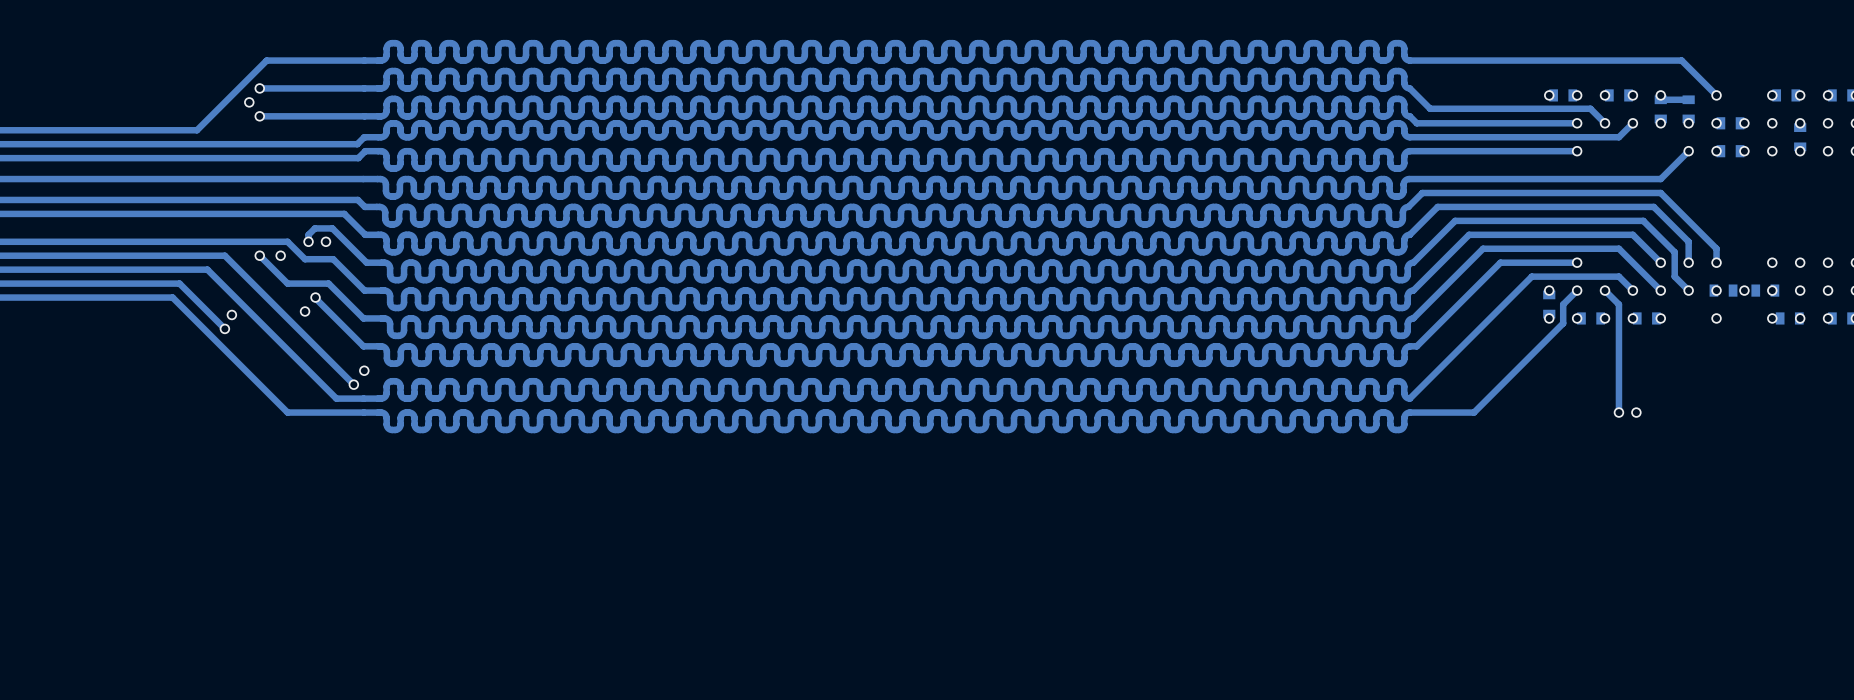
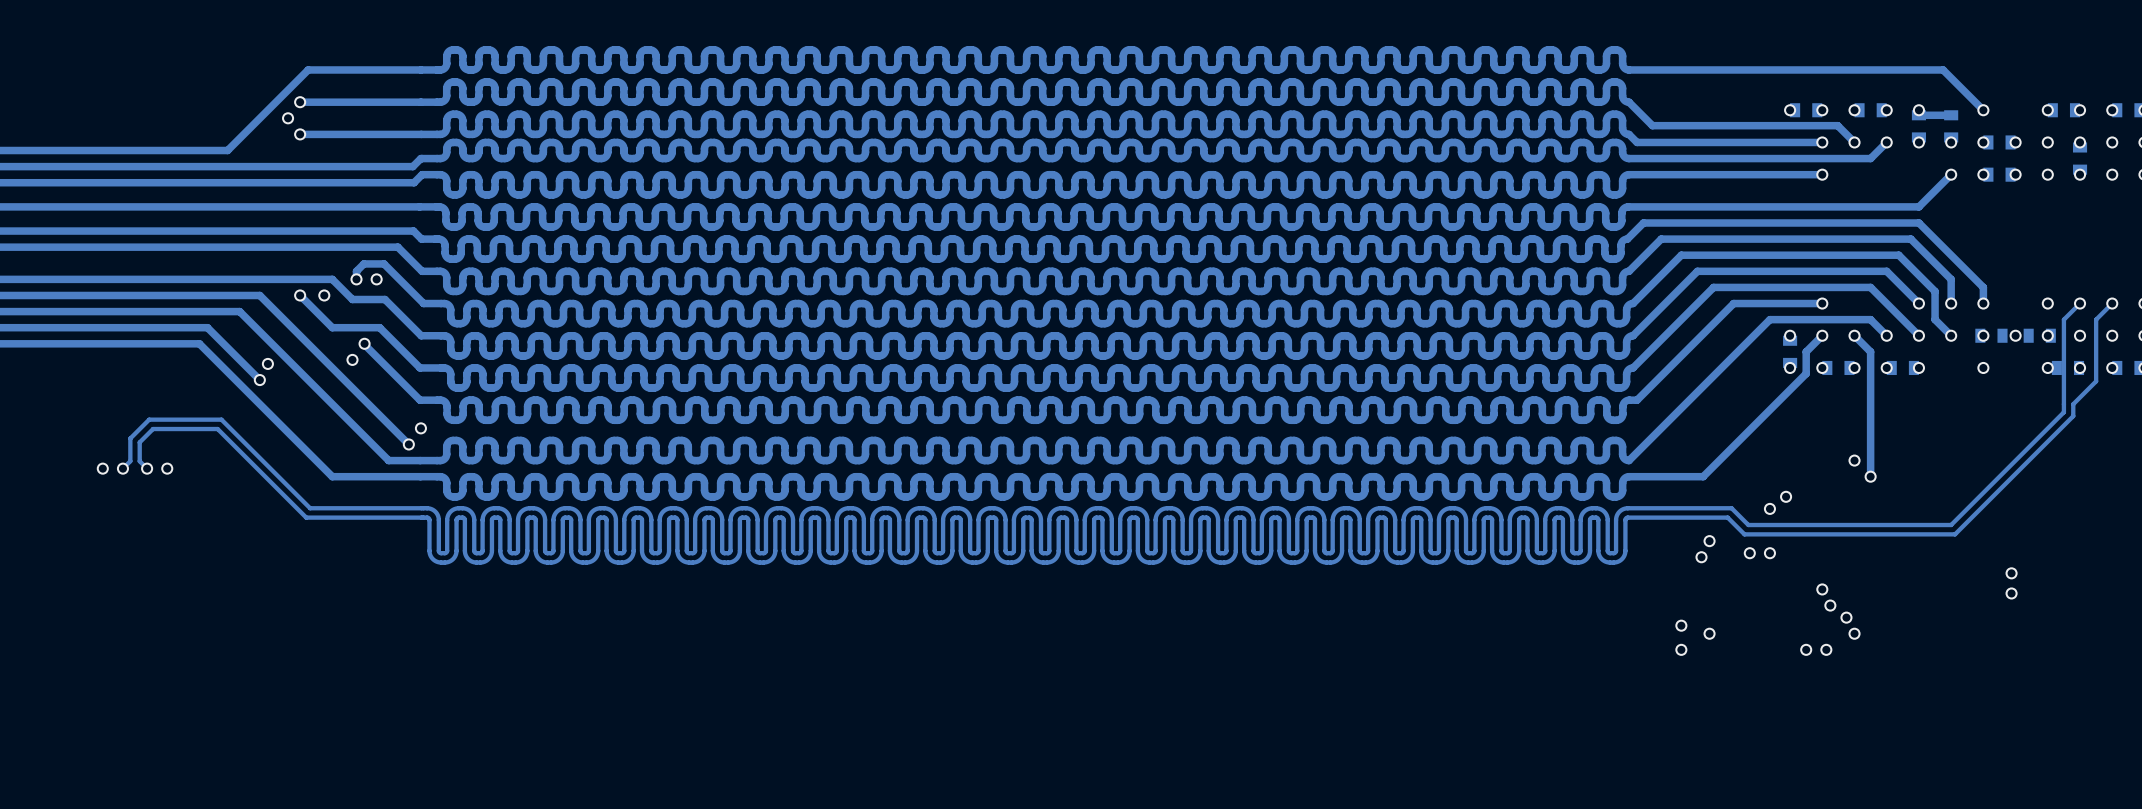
track: none -> (2080, 303) (2063, 319) (2063, 412) (1951, 525) (1748, 525) (1731, 508) (1626, 508) (1620, 510) (1616, 515) (1616, 551) (1610, 553) (1607, 551) (1606, 515) (1600, 509) (1590, 508) (1585, 510) (1581, 515) (1580, 551) (1574, 553) (1572, 551) (1571, 515) (1565, 509) (1555, 508) (1549, 510) (1546, 515) (1545, 551) (1539, 553) (1536, 551) (1535, 515) (1530, 509) (1521, 508) (1515, 509) (1510, 515) (1509, 551) (1503, 553) (1501, 551) (1500, 515) (1495, 509) (1486, 508) (1480, 509) (1475, 515) (1474, 551) (1468, 553) (1466, 551) (1465, 515) (1460, 509) (1450, 508) (1444, 509) (1439, 515) (1438, 551) (1433, 553) (1430, 551) (1429, 515) (1424, 509) (1415, 508) (1409, 509) (1404, 515) (1403, 551) (1397, 553) (1395, 551) (1394, 515) (1389, 509) (1379, 508) (1372, 510) (1369, 515) (1368, 551) (1362, 553) (1359, 551) (1358, 515) (1353, 509) (1344, 508) (1337, 510) (1333, 515) (1332, 551) (1326, 553) (1324, 551) (1323, 515) (1318, 509) (1309, 508) (1301, 510) (1298, 515) (1297, 551) (1291, 553) (1288, 551) (1288, 515) (1283, 509) (1273, 508) (1266, 510) (1262, 515) (1261, 551) (1255, 553) (1253, 551) (1252, 515) (1247, 509) (1238, 508) (1231, 510) (1227, 515) (1226, 551) (1220, 553) (1218, 551) (1217, 515) (1212, 509) (1202, 508) (1195, 510) (1191, 515) (1190, 551) (1185, 553) (1182, 551) (1181, 515) (1176, 509) (1167, 508) (1161, 509) (1156, 515) (1155, 551) (1149, 553) (1147, 551) (1146, 515) (1141, 509) (1131, 508) (1124, 510) (1121, 515) (1120, 551) (1114, 553) (1111, 551) (1110, 515) (1105, 509) (1096, 508) (1089, 510) (1085, 515) (1084, 551) (1078, 553) (1076, 551) (1075, 515) (1070, 509) (1061, 508) (1053, 510) (1050, 515) (1049, 551) (1043, 553) (1041, 551) (1040, 515) (1035, 509) (1025, 508) (1018, 510) (1014, 515) (1013, 551) (1007, 553) (1005, 551) (1004, 515) (999, 509) (990, 508) (984, 509) (979, 515) (978, 551) (972, 553) (970, 551) (969, 515) (964, 509) (954, 508) (948, 509) (943, 515) (943, 551) (937, 553) (934, 551) (933, 515) (928, 509) (919, 508) (912, 510) (908, 515) (907, 551) (901, 553) (899, 551) (898, 515) (893, 509) (883, 508) (878, 509) (873, 515) (872, 551) (866, 553) (863, 551) (862, 515) (857, 509) (848, 508) (842, 509) (837, 515) (836, 551) (830, 553) (828, 551) (827, 515) (822, 509) (813, 508) (805, 510) (802, 515) (801, 551) (795, 553) (793, 551) (792, 515) (787, 509) (777, 508) (770, 510) (766, 515) (765, 551) (760, 553) (757, 551) (756, 515) (751, 509) (742, 508) (735, 510) (731, 515) (730, 551) (724, 553) (722, 551) (721, 515) (716, 509) (706, 508) (699, 510) (696, 515) (695, 551) (689, 553) (686, 551) (685, 515) (680, 509) (671, 508) (664, 510) (660, 515) (659, 551) (653, 553) (651, 551) (650, 515) (645, 509) (636, 508) (630, 509) (625, 515) (624, 551) (618, 553) (615, 551) (615, 515) (610, 509) (600, 508) (594, 509) (589, 515) (588, 551) (582, 553) (580, 551) (579, 515) (574, 509) (565, 508) (559, 509) (554, 515) (553, 551) (547, 553) (545, 551) (544, 515) (539, 509) (529, 508) (523, 509) (518, 515) (518, 551) (512, 553) (509, 551) (508, 515) (503, 509) (494, 508) (487, 510) (483, 515) (482, 551) (476, 553) (474, 551) (473, 515) (468, 509) (458, 508) (451, 510) (448, 515) (447, 551) (441, 553) (438, 551) (438, 518) (432, 509) (427, 508) (310, 508) (221, 419) (149, 419) (130, 438) (130, 461) (122, 468)
track: none -> (2112, 303) (2096, 319) (2096, 381) (2073, 404) (2073, 416) (1955, 534) (1744, 534) (1727, 517) (1627, 517) (1625, 519) (1624, 555) (1619, 560) (1610, 562) (1602, 560) (1599, 555) (1598, 519) (1592, 517) (1590, 519) (1589, 555) (1584, 560) (1574, 562) (1567, 560) (1563, 555) (1562, 519) (1556, 517) (1554, 519) (1553, 555) (1548, 560) (1539, 562) (1533, 560) (1528, 555) (1527, 519) (1521, 517) (1519, 519) (1518, 555) (1513, 560) (1503, 562) (1496, 560) (1492, 555) (1492, 519) (1486, 517) (1483, 519) (1482, 555) (1477, 560) (1468, 562) (1462, 560) (1457, 555) (1456, 519) (1450, 517) (1448, 519) (1447, 555) (1442, 560) (1433, 562) (1427, 560) (1422, 555) (1421, 519) (1415, 517) (1412, 519) (1412, 555) (1407, 560) (1397, 562) (1390, 560) (1386, 555) (1385, 519) (1379, 517) (1377, 519) (1376, 555) (1371, 560) (1362, 562) (1356, 560) (1351, 555) (1350, 519) (1344, 517) (1342, 519) (1341, 555) (1336, 560) (1326, 562) (1320, 560) (1315, 555) (1314, 519) (1309, 517) (1306, 519) (1305, 555) (1300, 560) (1291, 562) (1285, 560) (1280, 555) (1279, 519) (1273, 517) (1271, 519) (1270, 555) (1265, 560) (1255, 562) (1250, 560) (1245, 555) (1244, 519) (1238, 517) (1235, 519) (1234, 555) (1229, 560) (1220, 562) (1214, 560) (1209, 555) (1208, 519) (1202, 517) (1200, 519) (1199, 555) (1194, 560) (1185, 562) (1177, 560) (1174, 555) (1173, 519) (1167, 517) (1164, 519) (1164, 555) (1159, 560) (1149, 562) (1143, 560) (1138, 555) (1137, 519) (1131, 517) (1129, 519) (1128, 555) (1123, 560) (1114, 562) (1108, 560) (1103, 555) (1102, 519) (1096, 517) (1094, 519) (1093, 555) (1088, 560) (1078, 562) (1072, 560) (1067, 555) (1067, 519) (1061, 517) (1058, 519) (1057, 555) (1052, 560) (1043, 562) (1036, 560) (1032, 555) (1031, 519) (1025, 517) (1023, 519) (1022, 555) (1017, 560) (1007, 562) (1002, 560) (997, 555) (996, 519) (990, 517) (987, 519) (986, 555) (981, 560) (972, 562) (966, 560) (961, 555) (960, 519) (954, 517) (952, 519) (951, 555) (946, 560) (937, 562) (929, 560) (926, 555) (925, 519) (919, 517) (917, 519) (916, 555) (911, 560) (901, 562) (895, 560) (890, 555) (889, 519) (883, 517) (881, 519) (880, 555) (875, 560) (866, 562) (859, 560) (855, 555) (854, 519) (848, 517) (846, 519) (845, 555) (840, 560) (830, 562) (824, 560) (819, 555) (819, 519) (813, 517) (810, 519) (809, 555) (804, 560) (795, 562) (788, 560) (784, 555) (783, 519) (777, 517) (775, 519) (774, 555) (769, 560) (760, 562) (754, 560) (749, 555) (748, 519) (742, 517) (739, 519) (739, 555) (734, 560) (724, 562) (717, 560) (713, 555) (712, 519) (706, 517) (704, 519) (703, 555) (698, 560) (689, 562) (682, 560) (678, 555) (677, 519) (671, 517) (669, 519) (668, 555) (663, 560) (653, 562) (647, 560) (642, 555) (641, 519) (636, 517) (633, 519) (632, 555) (627, 560) (618, 562) (611, 560) (607, 555) (606, 519) (600, 517) (598, 519) (597, 555) (592, 560) (582, 562) (577, 560) (572, 555) (571, 519) (565, 517) (562, 519) (561, 555) (556, 560) (547, 562) (540, 560) (536, 555) (535, 519) (529, 517) (527, 519) (526, 555) (521, 560) (512, 562) (506, 560) (501, 555) (500, 519) (494, 517) (491, 519) (491, 555) (486, 560) (476, 562) (470, 560) (465, 555) (464, 519) (458, 517) (456, 519) (455, 555) (450, 560) (441, 562) (434, 560) (429, 553) (428, 517) (306, 517) (217, 429) (153, 429) (139, 442) (139, 461) (147, 468)
via: none -> (102, 468)
via: none -> (122, 468)
via: none -> (147, 468)
via: none -> (167, 468)
via position: (1636, 412) -> (1854, 460)
via: none -> (1786, 496)
via: none -> (1769, 508)
via: none -> (1709, 541)
via: none -> (1749, 553)
via: none -> (1769, 553)
via: none -> (1701, 557)
via: none -> (2011, 573)
via: none -> (1822, 589)
via: none -> (2011, 593)
via: none -> (1830, 605)
via: none -> (1846, 617)
via: none -> (1681, 625)
via: none -> (1709, 633)
via: none -> (1854, 633)
via: none -> (1681, 649)
via: none -> (1806, 649)
via: none -> (1826, 649)

